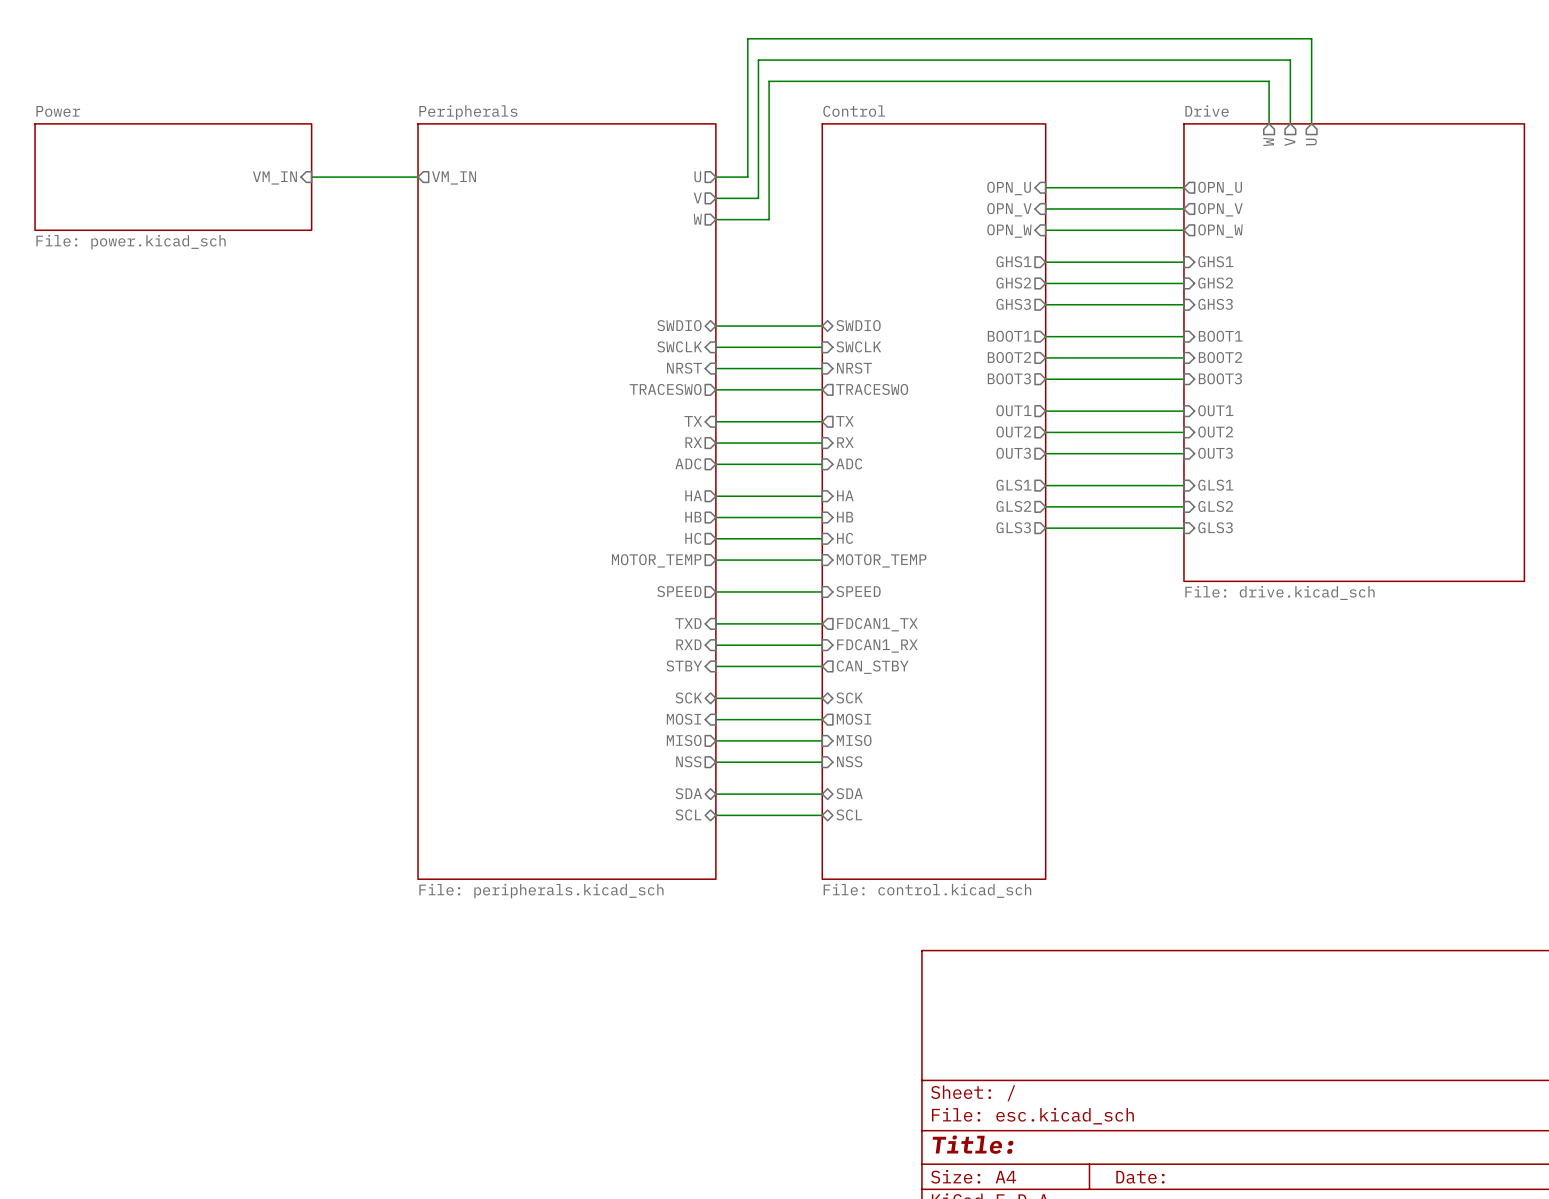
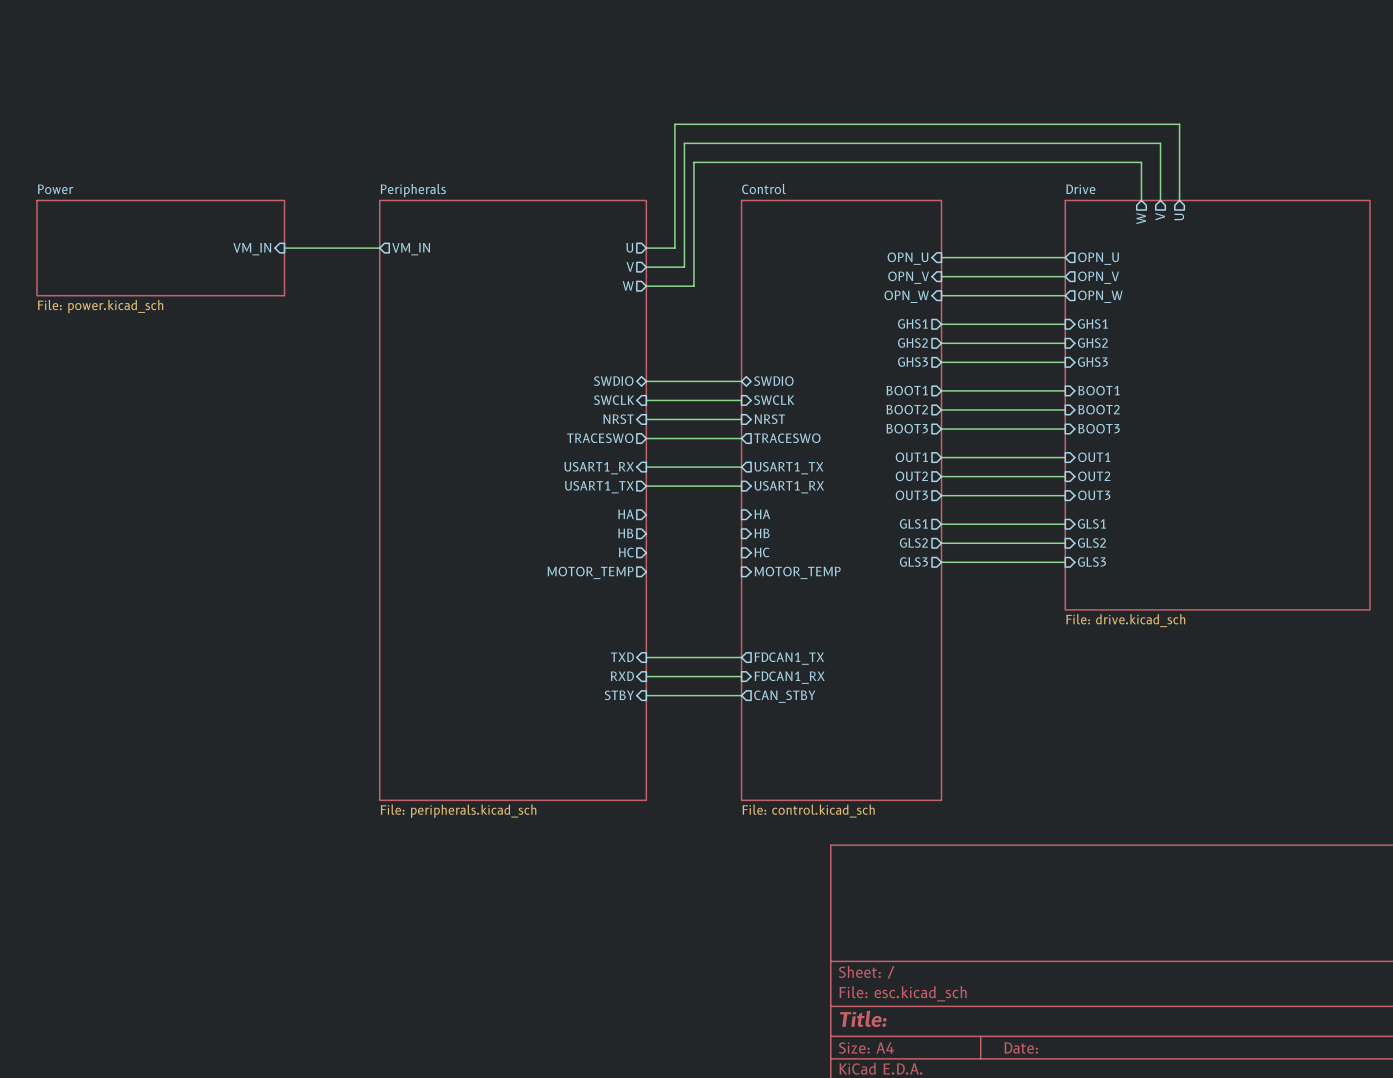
wire: (1269, 123) (1269, 81) (769, 81) (769, 187) -> (941, 162) (693, 162)
wire: (1290, 123) (1290, 60) (758, 60) (758, 166) -> (1160, 200) (1160, 143) (684, 143)
wire: (1311, 123) (1311, 38) (747, 38) (747, 145) -> (1179, 200) (1179, 124) (674, 124)
sheet pin position: W (1268, 141) -> W (1141, 218)
sheet pin position: V (1289, 141) -> V (1160, 216)
sheet pin position: U (1311, 141) -> U (1179, 217)
sheet pin position: U (697, 176) -> U (629, 247)
sheet Power position: (173, 177) -> (160, 248)
sheet pin: VM_IN (274, 177) -> none
wire: (311, 177) (418, 177) -> (284, 248) (379, 248)
sheet pin: VM_IN (454, 177) -> none
wire: (715, 177) (747, 177) -> (646, 248) (674, 248) (674, 152)
wire: none -> (1065, 162) (1141, 162) (1141, 200)
sheet pin: OPN_U (1009, 188) -> none
sheet pin: OPN_U (1220, 188) -> none
sheet pin position: V (697, 197) -> V (630, 266)
wire: (715, 198) (758, 198) -> (646, 267) (684, 267) (684, 171)
sheet pin: OPN_V (1009, 209) -> none
wire: (1045, 209) (1183, 209) -> (941, 257) (1065, 257)
sheet pin: OPN_V (1220, 209) -> none
sheet pin: W (697, 219) -> none
wire: (715, 219) (769, 219) -> (693, 286) (693, 190)
wire: (1045, 230) (1183, 230) -> (941, 276) (1065, 276)
sheet pin: OPN_W (1009, 231) -> none
sheet pin: OPN_W (1220, 231) -> none
sheet pin: GHS1 (1013, 261) -> none
sheet pin: GHS1 (1215, 261) -> none
wire: (1045, 262) (1183, 262) -> none
sheet pin: GHS2 (1013, 283) -> none
wire: (1045, 283) (1183, 283) -> (941, 324) (1065, 324)
sheet pin: GHS2 (1215, 283) -> none
sheet pin: none -> VM_IN (252, 249)
sheet pin: none -> VM_IN (411, 249)
sheet pin: none -> OPN_U (907, 258)
sheet pin: none -> OPN_U (1098, 258)
sheet pin: GHS3 (1013, 304) -> none
wire: (1045, 304) (1183, 304) -> (941, 343) (1065, 343)
sheet pin: GHS3 (1215, 304) -> none
sheet pin: none -> OPN_V (908, 277)
sheet pin: none -> OPN_V (1098, 277)
sheet pin shape: bidirectional (679, 325) -> output (628, 285)
sheet pin: SWDIO (679, 325) -> W (628, 285)
sheet pin: SWDIO (858, 325) -> none
wire: (769, 326) (822, 326) -> none
sheet pin shape: output (1009, 336) -> input (906, 296)
sheet pin: BOOT1 (1009, 336) -> OPN_W (906, 296)
sheet pin shape: input (1220, 336) -> output (1100, 296)
sheet pin: BOOT1 (1220, 336) -> OPN_W (1100, 296)
sheet pin: SWCLK (679, 346) -> none
sheet pin: SWCLK (858, 346) -> none
wire: (715, 347) (822, 347) -> (646, 381) (741, 381)
sheet Drive position: (1354, 352) -> (1217, 405)
sheet pin: BOOT2 (1009, 357) -> none
wire: (1045, 357) (1183, 357) -> (941, 390) (1065, 390)
sheet pin: BOOT2 (1220, 357) -> none
sheet pin: NRST (684, 368) -> none
wire: (715, 368) (822, 368) -> (646, 400) (741, 400)
sheet pin: NRST (854, 368) -> none
sheet pin: none -> GHS1 (912, 323)
sheet pin: none -> GHS1 (1092, 323)
sheet pin: BOOT3 (1009, 378) -> none
sheet pin: BOOT3 (1220, 378) -> none
wire: (1045, 379) (1183, 379) -> (941, 409) (1065, 409)
sheet pin: TRACESWO (665, 389) -> none
wire: (715, 389) (822, 389) -> (646, 419) (741, 419)
sheet pin: TRACESWO (872, 389) -> none
sheet pin: none -> GHS2 (912, 343)
sheet pin: none -> GHS2 (1092, 343)
sheet pin: OUT1 (1013, 410) -> GHS3 (912, 362)
sheet pin: OUT1 (1215, 410) -> GHS3 (1092, 362)
sheet pin: TX (693, 421) -> none
wire: (715, 421) (822, 421) -> none
sheet pin: TX (844, 421) -> none
sheet pin: none -> SWDIO (613, 381)
sheet pin: none -> SWDIO (773, 381)
sheet pin: OUT2 (1013, 432) -> none
wire: (1045, 432) (1183, 432) -> (941, 457) (1065, 457)
sheet pin: OUT2 (1215, 432) -> none
sheet pin: RX (693, 442) -> none
sheet pin: RX (845, 442) -> none
sheet pin: none -> BOOT1 (907, 390)
sheet pin: none -> BOOT1 (1099, 390)
wire: (715, 443) (822, 443) -> (646, 467) (741, 467)
sheet pin: none -> SWCLK (614, 400)
sheet pin: none -> SWCLK (774, 400)
sheet pin: OUT3 (1013, 453) -> none
wire: (1045, 453) (1183, 453) -> (941, 476) (1065, 476)
sheet pin: OUT3 (1215, 453) -> none
sheet pin: ADC (688, 463) -> none
sheet pin: ADC (849, 463) -> none
sheet pin: none -> BOOT2 (907, 409)
sheet pin: none -> BOOT2 (1099, 409)
wire: (715, 464) (822, 464) -> (646, 486) (741, 486)
sheet pin: none -> NRST (618, 419)
sheet pin: none -> NRST (769, 419)
sheet pin: GLS1 (1013, 485) -> BOOT3 (907, 428)
sheet pin: GLS1 (1215, 485) -> BOOT3 (1099, 428)
sheet pin: HA (693, 495) -> TRACESWO (600, 438)
sheet pin shape: input (845, 495) -> output (787, 438)
sheet pin: HA (845, 495) -> TRACESWO (787, 438)
sheet Peripherals: File: peripherals.kicad_sch (566, 501) -> none
sheet Control: File: control.kicad_sch (933, 501) -> none
sheet pin: GLS2 (1013, 506) -> none
wire: (1045, 506) (1183, 506) -> (941, 524) (1065, 524)
sheet pin: GLS2 (1215, 506) -> none
sheet pin: HB (693, 517) -> none
wire: (715, 517) (822, 517) -> none
sheet pin: HB (845, 517) -> none
sheet pin: none -> OUT1 (911, 457)
sheet pin: none -> OUT1 (1094, 457)
sheet pin: GLS3 (1013, 527) -> none
sheet pin: GLS3 (1215, 527) -> none
sheet pin: none -> USART1_RX (599, 468)
sheet pin: none -> USART1_TX (788, 468)
wire: (1045, 528) (1183, 528) -> (941, 543) (1065, 543)
sheet pin: HC (693, 538) -> none
wire: (715, 538) (822, 538) -> none
sheet pin: HC (845, 538) -> none
sheet pin: none -> OUT2 (911, 476)
sheet pin: none -> OUT2 (1094, 476)
sheet pin: none -> USART1_TX (599, 487)
sheet pin: none -> USART1_RX (789, 487)
sheet pin: none -> OUT3 (911, 495)
sheet pin: none -> OUT3 (1094, 495)
sheet pin: MOTOR_TEMP (656, 560) -> none
wire: (715, 560) (822, 560) -> none
sheet pin: MOTOR_TEMP (881, 560) -> none
wire: none -> (941, 495) (1065, 495)
sheet Peripherals: none -> File: peripherals.kicad_sch (513, 500)
sheet Control: none -> File: control.kicad_sch (841, 500)
sheet pin: none -> HA (626, 514)
sheet pin: none -> HA (762, 514)
sheet pin: SPEED (679, 591) -> none
wire: (715, 591) (822, 591) -> none
sheet pin: SPEED (858, 591) -> none
sheet pin: none -> GLS1 (913, 523)
sheet pin: none -> GLS1 (1091, 523)
sheet pin: none -> HB (625, 533)
sheet pin: none -> HB (762, 533)
sheet pin: none -> GLS2 (913, 542)
sheet pin: none -> GLS2 (1091, 542)
sheet pin shape: input (688, 623) -> output (626, 552)
sheet pin: TXD (688, 623) -> HC (626, 552)
wire: (715, 623) (822, 623) -> none
sheet pin shape: output (877, 624) -> input (762, 552)
sheet pin: FDCAN1_TX (877, 624) -> HC (762, 552)
sheet pin: none -> GLS3 (913, 562)
wire: none -> (941, 562) (1065, 562)
sheet pin: none -> GLS3 (1091, 562)
sheet pin shape: input (688, 644) -> output (590, 572)
sheet pin: RXD (688, 644) -> MOTOR_TEMP (590, 572)
wire: (715, 645) (822, 645) -> none
sheet pin: FDCAN1_RX (877, 645) -> MOTOR_TEMP (797, 572)
sheet pin position: STBY (684, 666) -> STBY (619, 695)
wire: (715, 666) (822, 666) -> none
sheet pin position: CAN_STBY (872, 667) -> CAN_STBY (784, 696)
sheet pin: SCK (688, 697) -> none
sheet pin: SCK (849, 697) -> none
wire: (715, 698) (822, 698) -> (646, 695) (741, 695)
sheet pin: MOSI (683, 719) -> none
wire: (715, 719) (822, 719) -> none
sheet pin: MOSI (853, 719) -> none
sheet pin shape: output (684, 740) -> input (622, 657)
sheet pin: MISO (684, 740) -> TXD (622, 657)
sheet pin shape: input (854, 740) -> output (789, 658)
sheet pin: MISO (854, 740) -> FDCAN1_TX (789, 658)
sheet pin shape: output (688, 761) -> input (622, 676)
sheet pin: NSS (688, 761) -> RXD (622, 676)
sheet pin: NSS (849, 761) -> FDCAN1_RX (789, 677)
sheet pin: SDA (688, 793) -> none
sheet pin: SDA (849, 793) -> none
wire: (715, 794) (822, 794) -> none
sheet pin: SCL (688, 814) -> none
sheet pin: SCL (849, 814) -> none
wire: (715, 815) (822, 815) -> none

